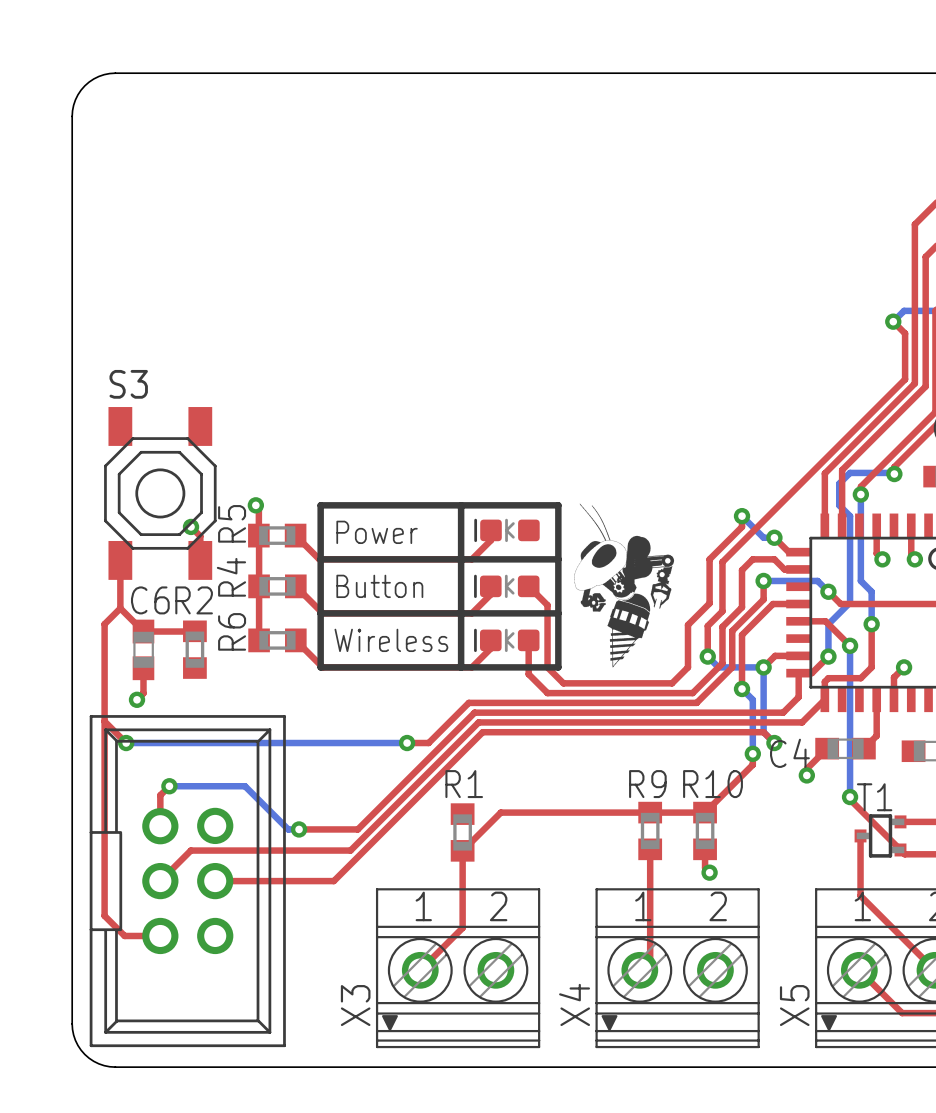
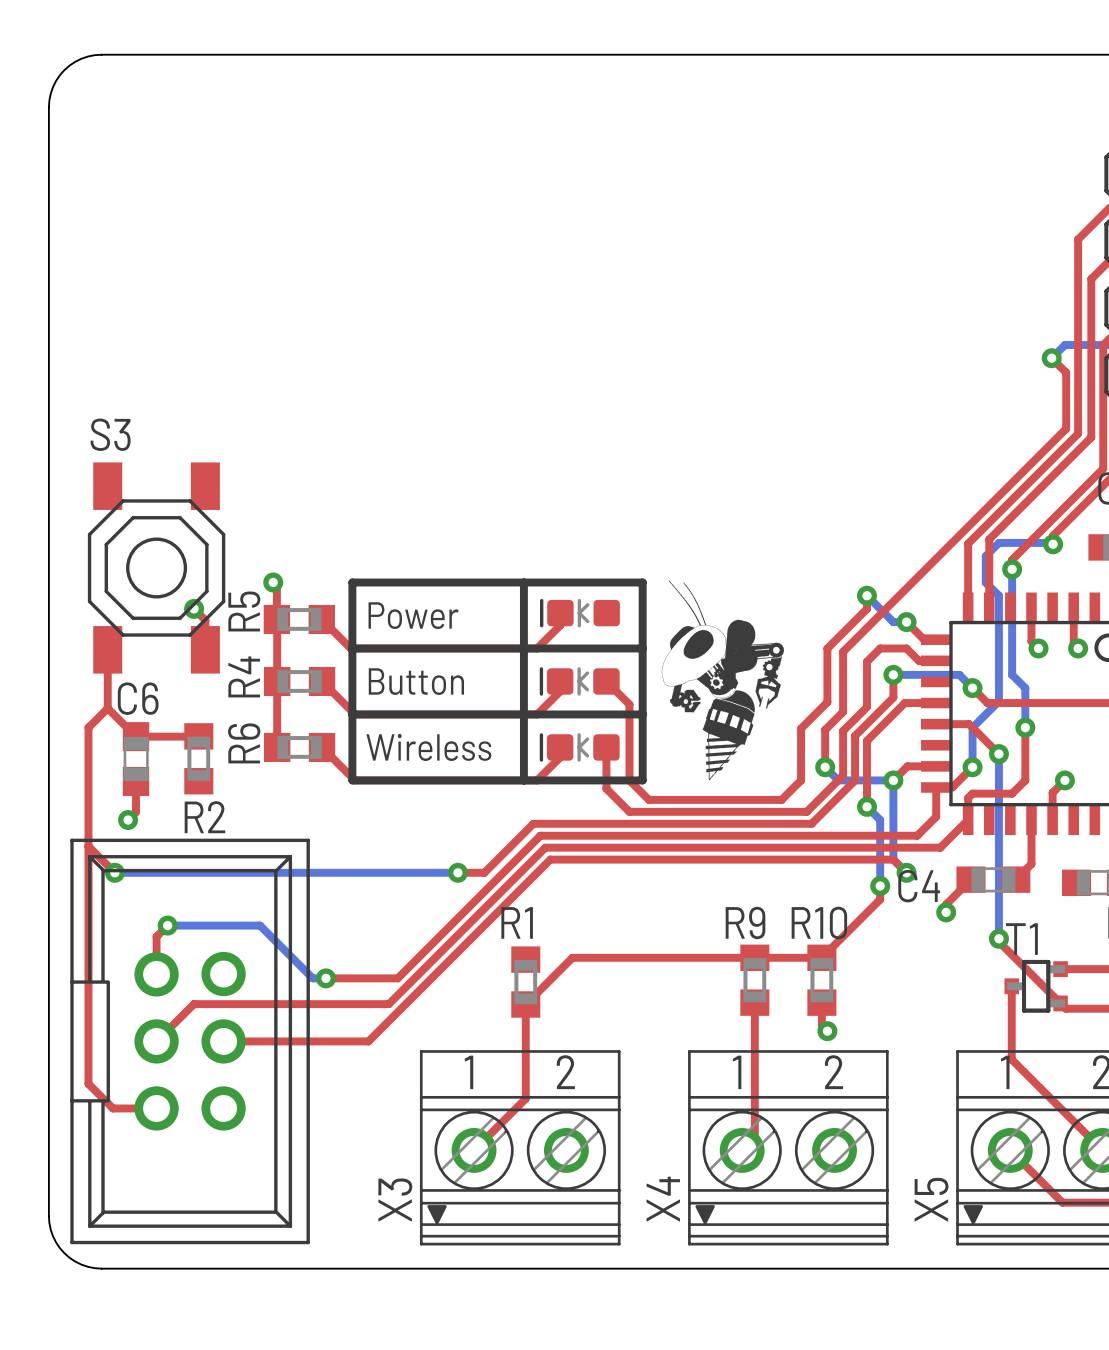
R2 name position: R2 (194, 600) -> R2 (204, 817)

